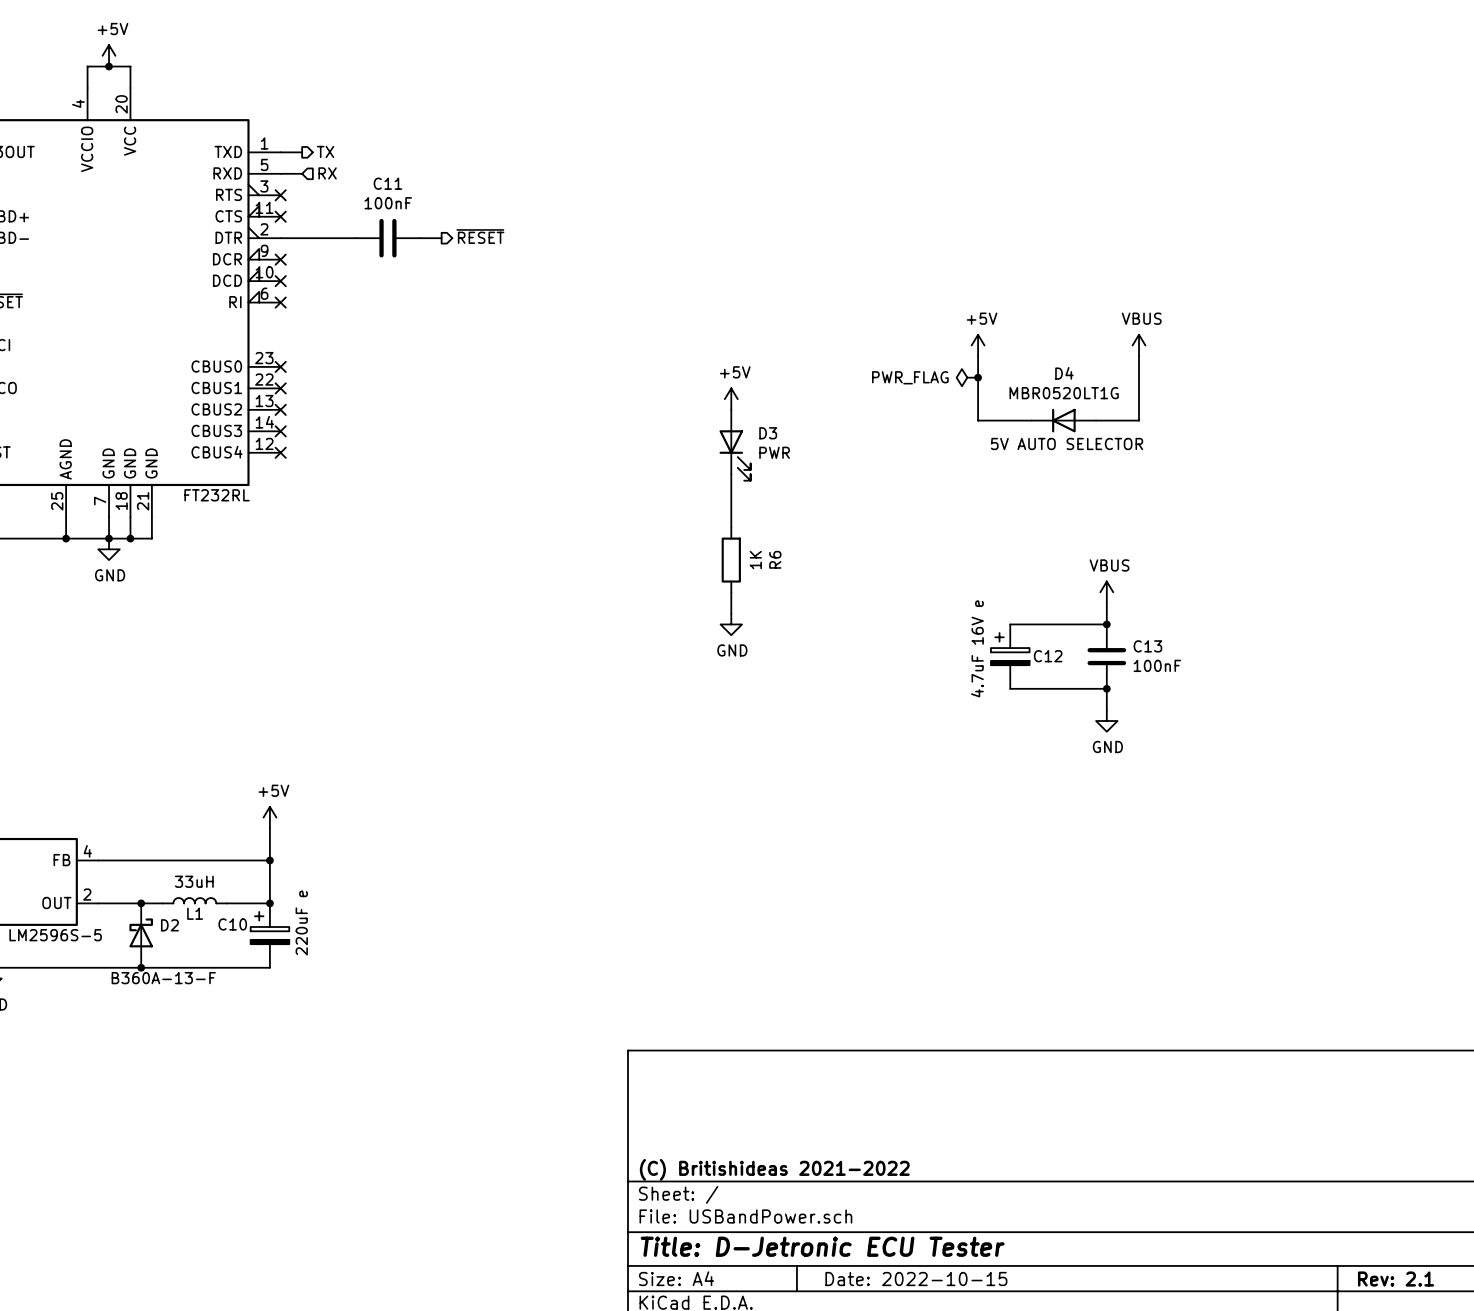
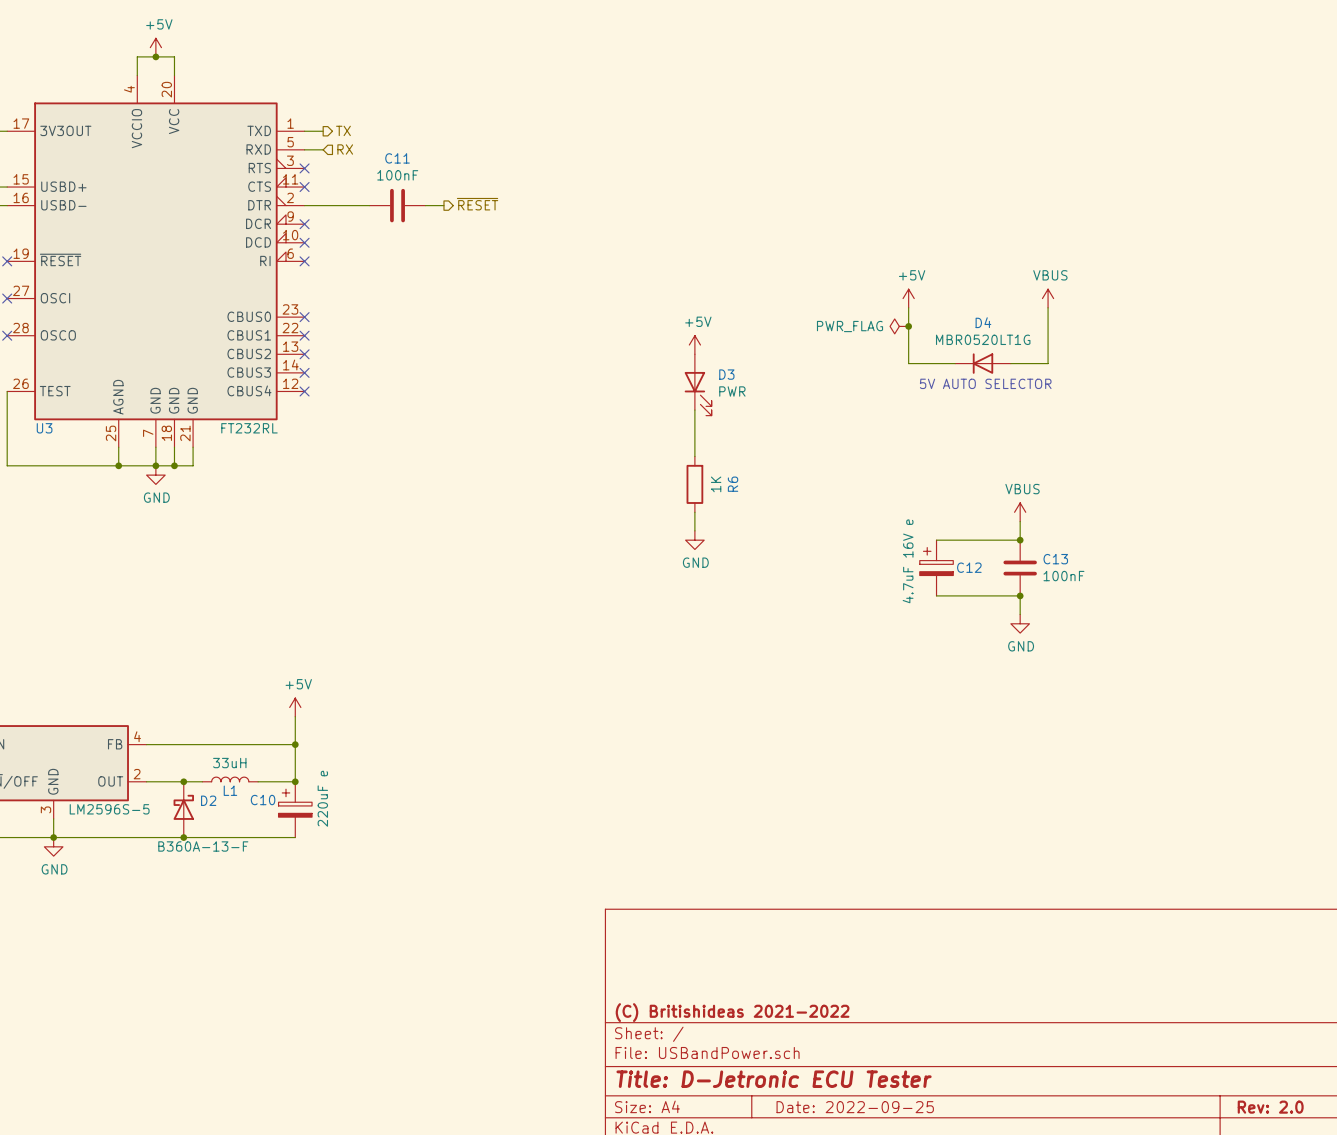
title block: Date: 2022-10-15 (916, 1279) -> Date: 2022-09-25 (855, 1107)
title block: Rev: 2.1 (1396, 1279) -> Rev: 2.0 (1270, 1107)

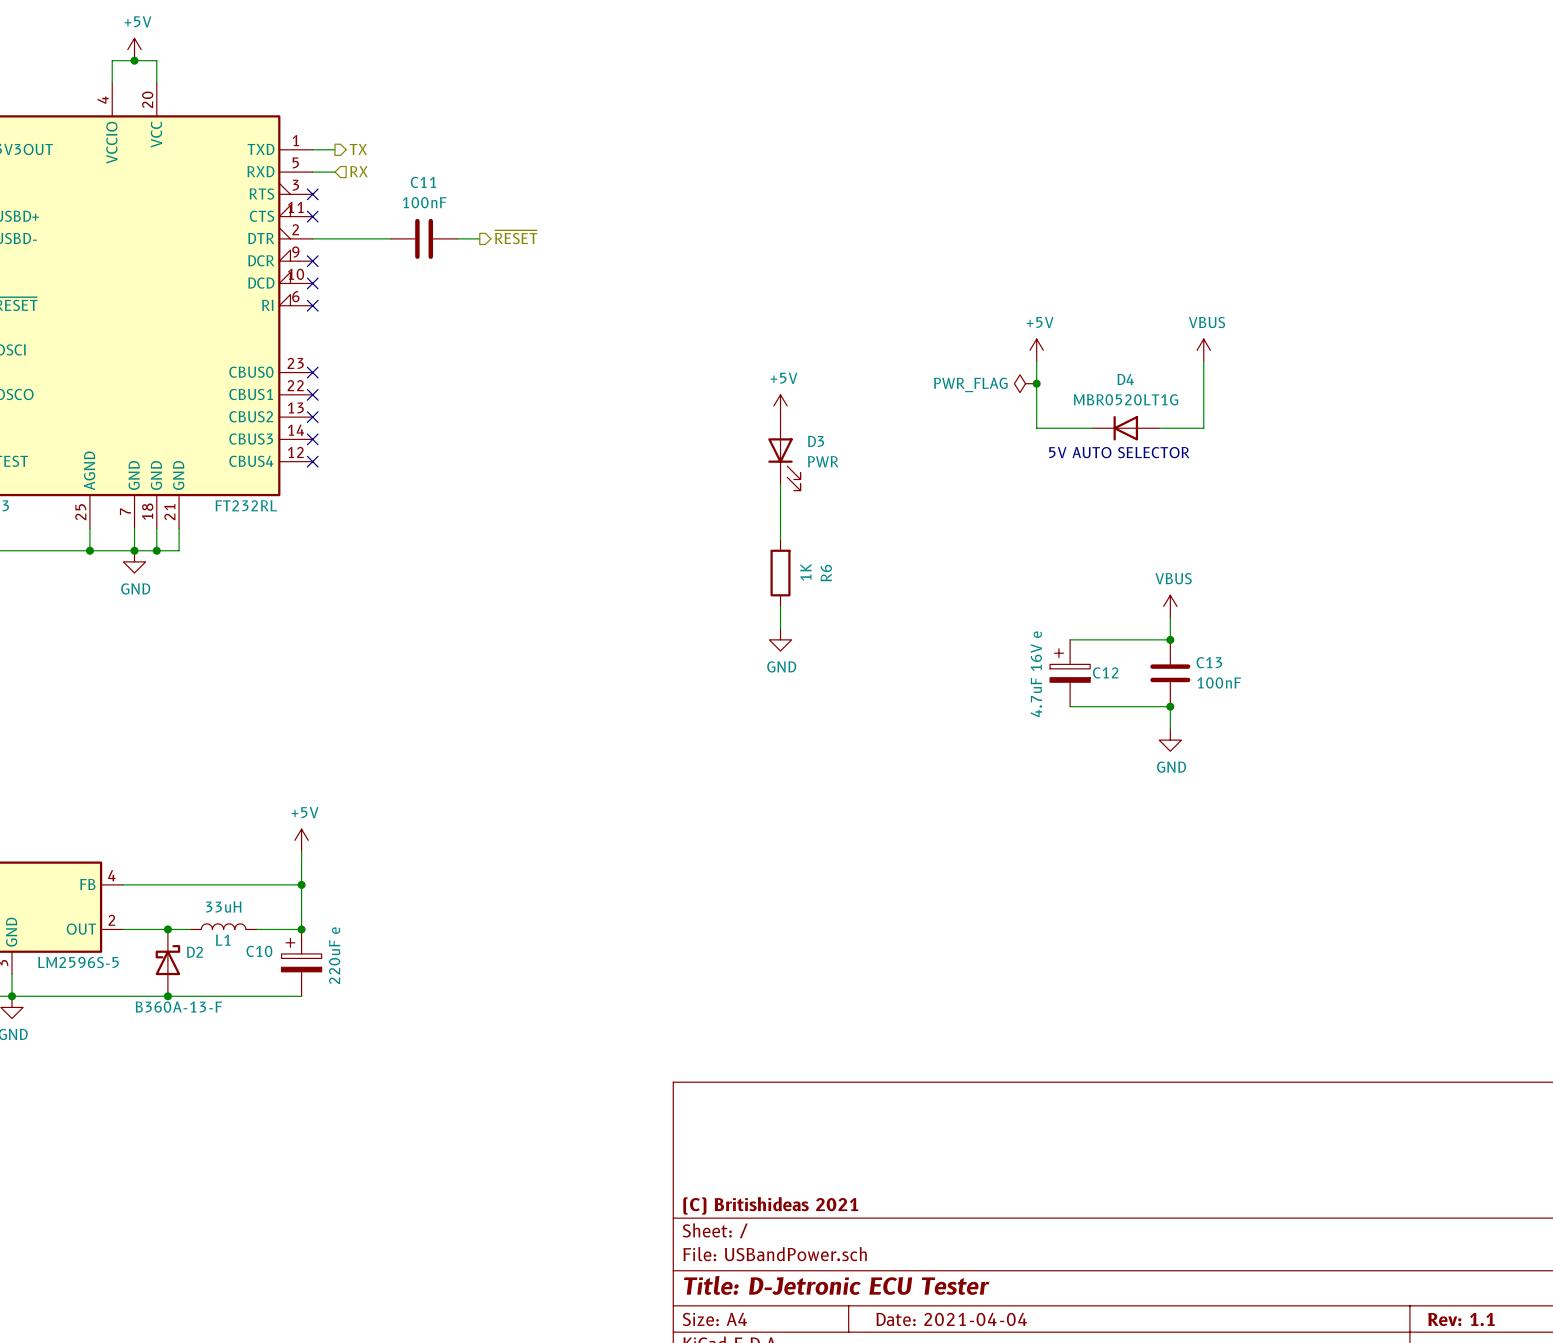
title block: (C) Britishideas 2021-2022 (732, 1012) -> (C) Britishideas 2021 (770, 1205)
title block: Date: 2022-09-25 (855, 1107) -> Date: 2021-04-04 (951, 1319)
title block: Rev: 2.0 (1270, 1107) -> Rev: 1.1 (1461, 1319)

